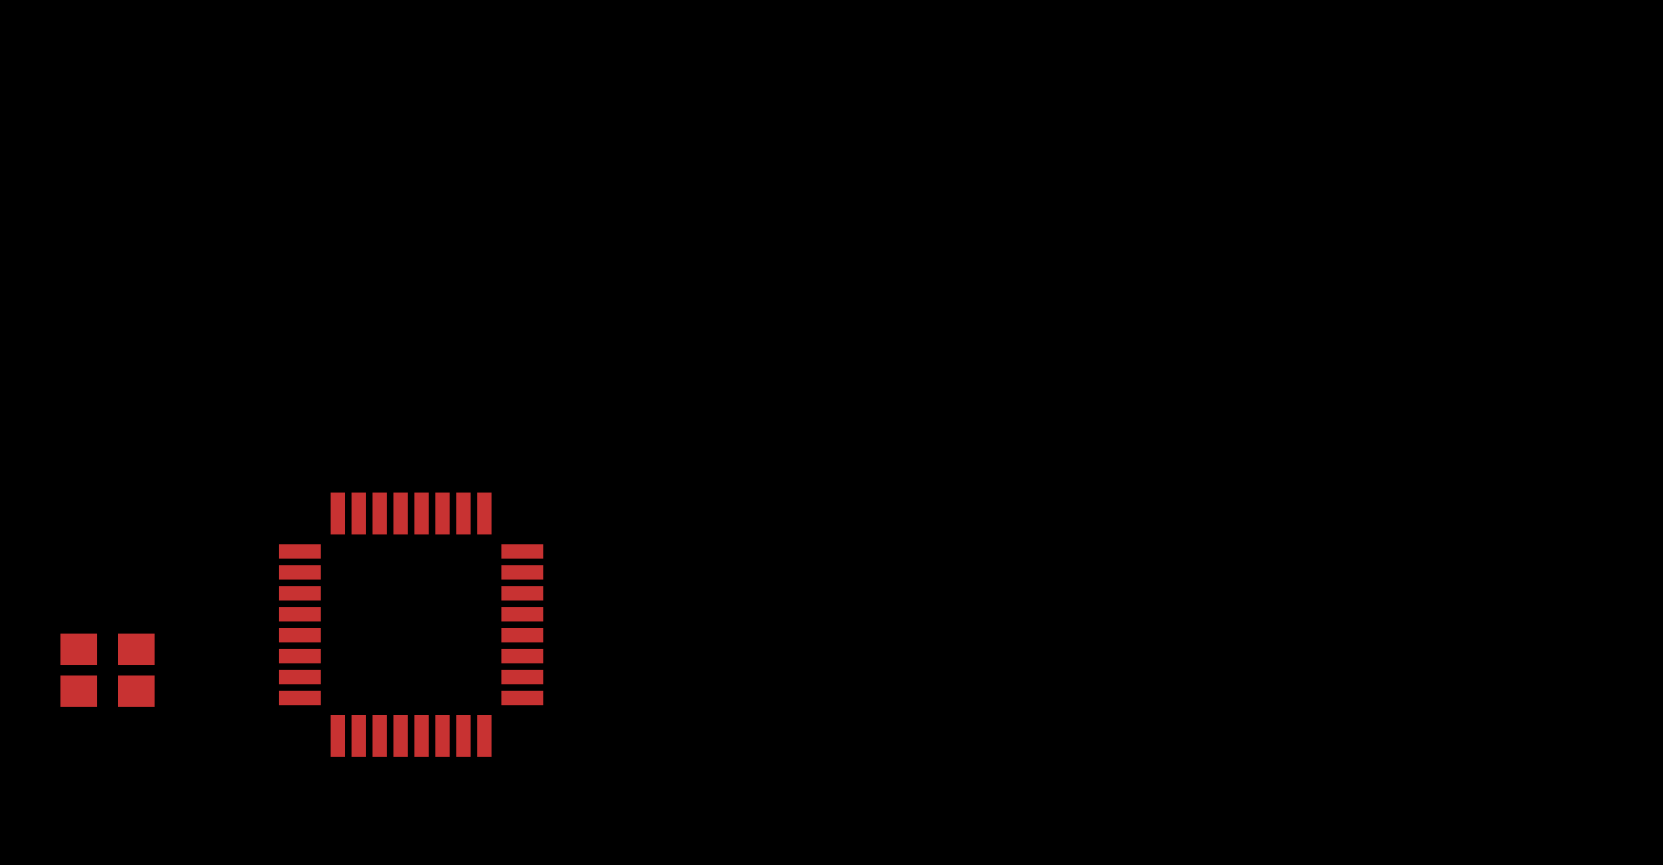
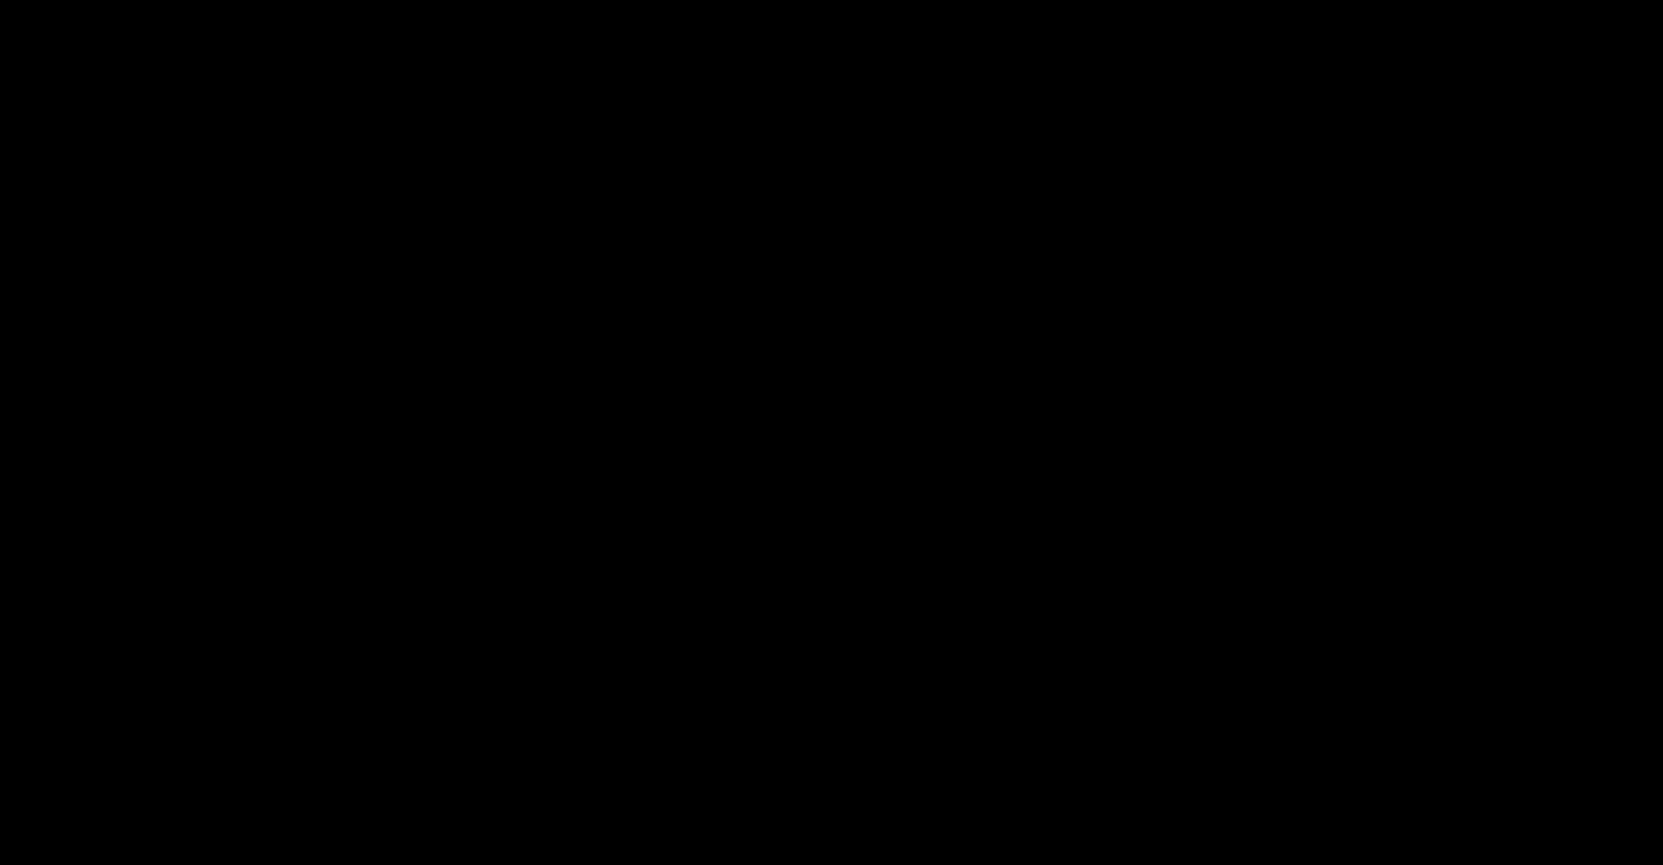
part: (411, 624) -> none
part: (107, 670) -> none

